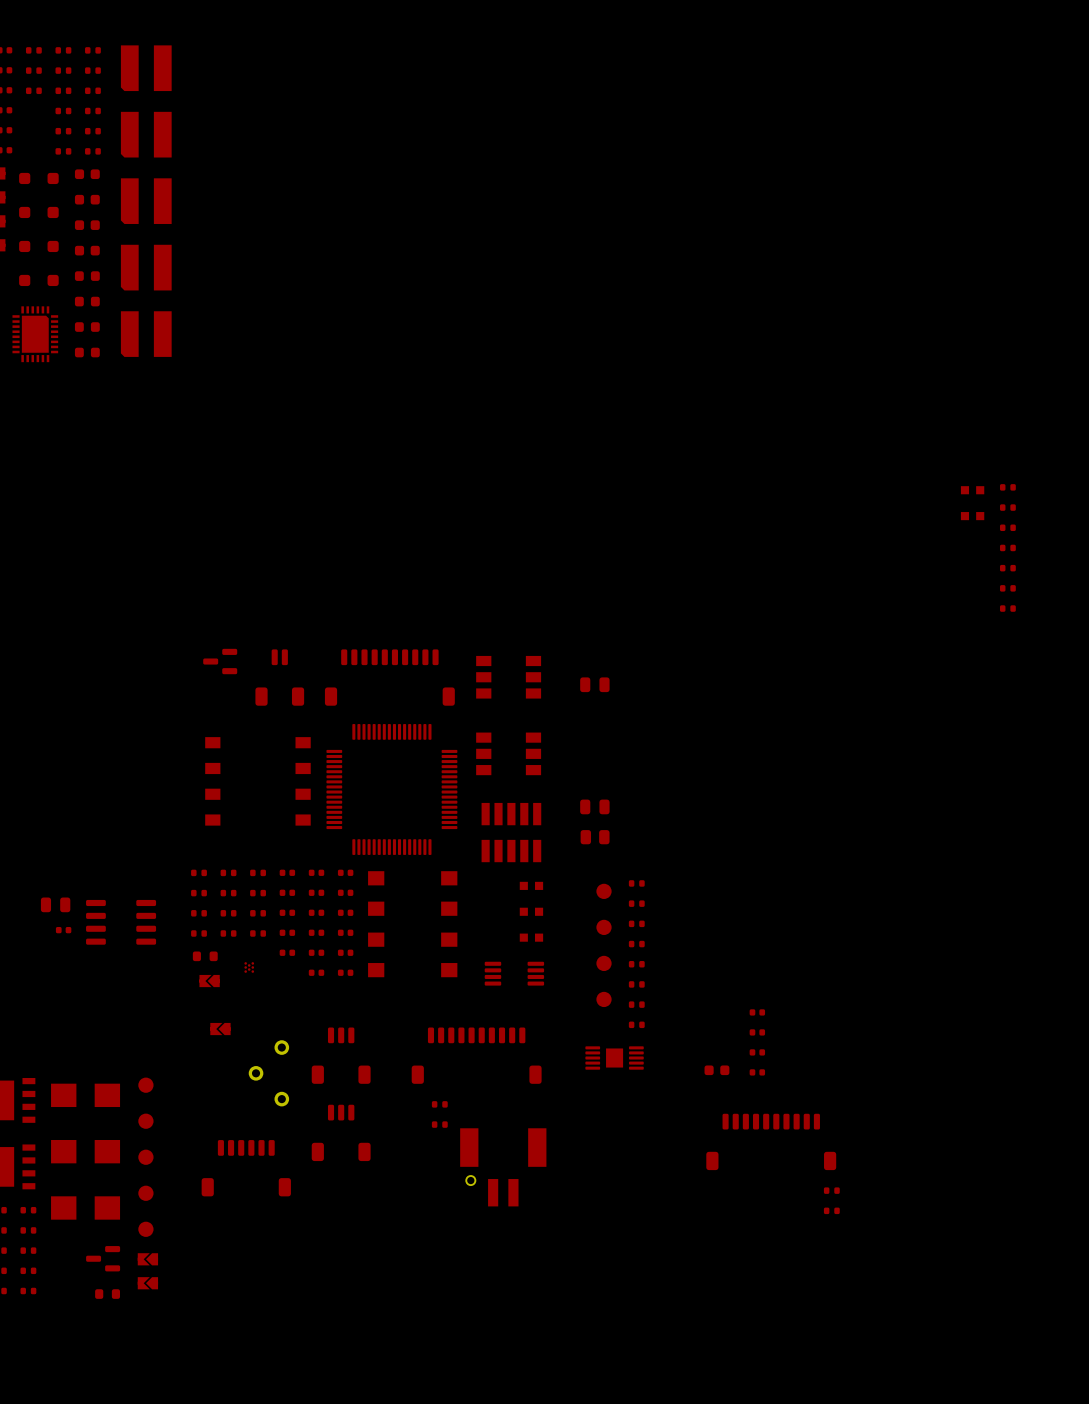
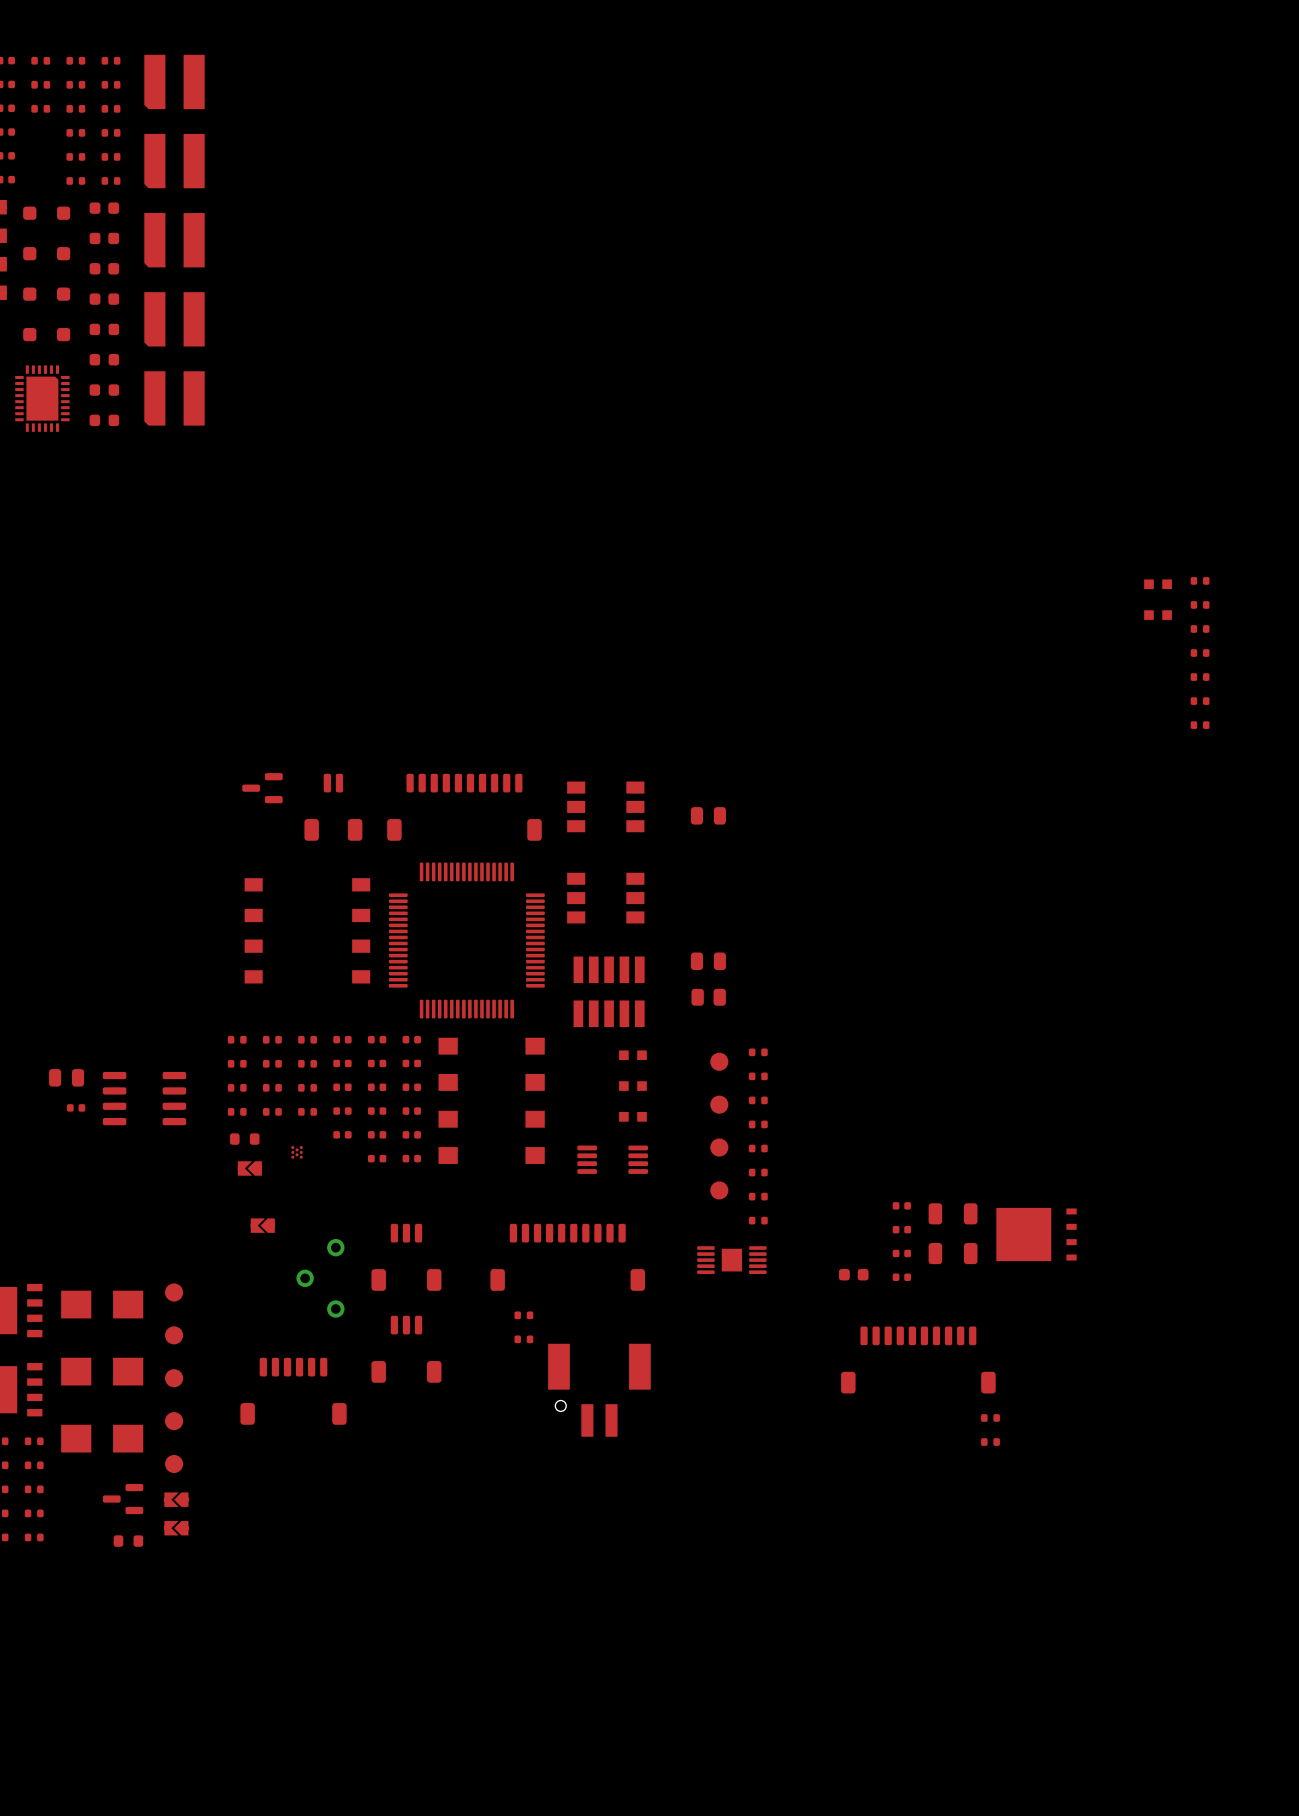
part: none -> (953, 1213)
part: none -> (1036, 1234)
part: none -> (953, 1253)

